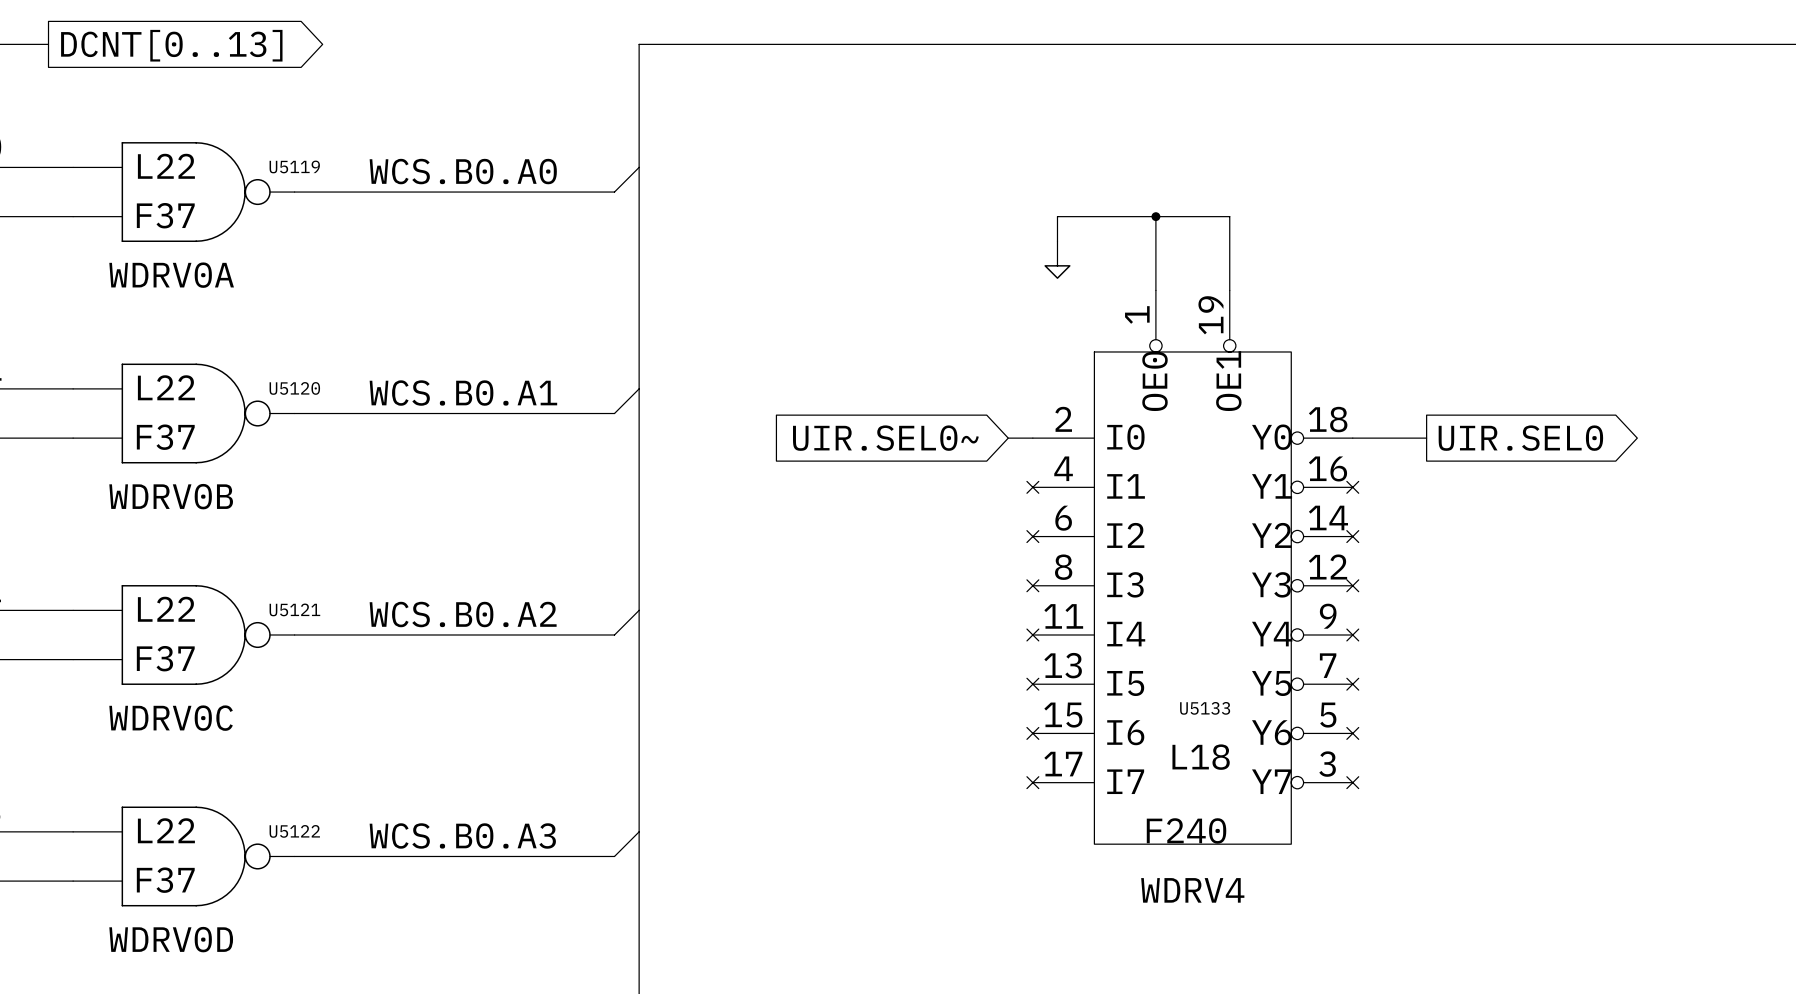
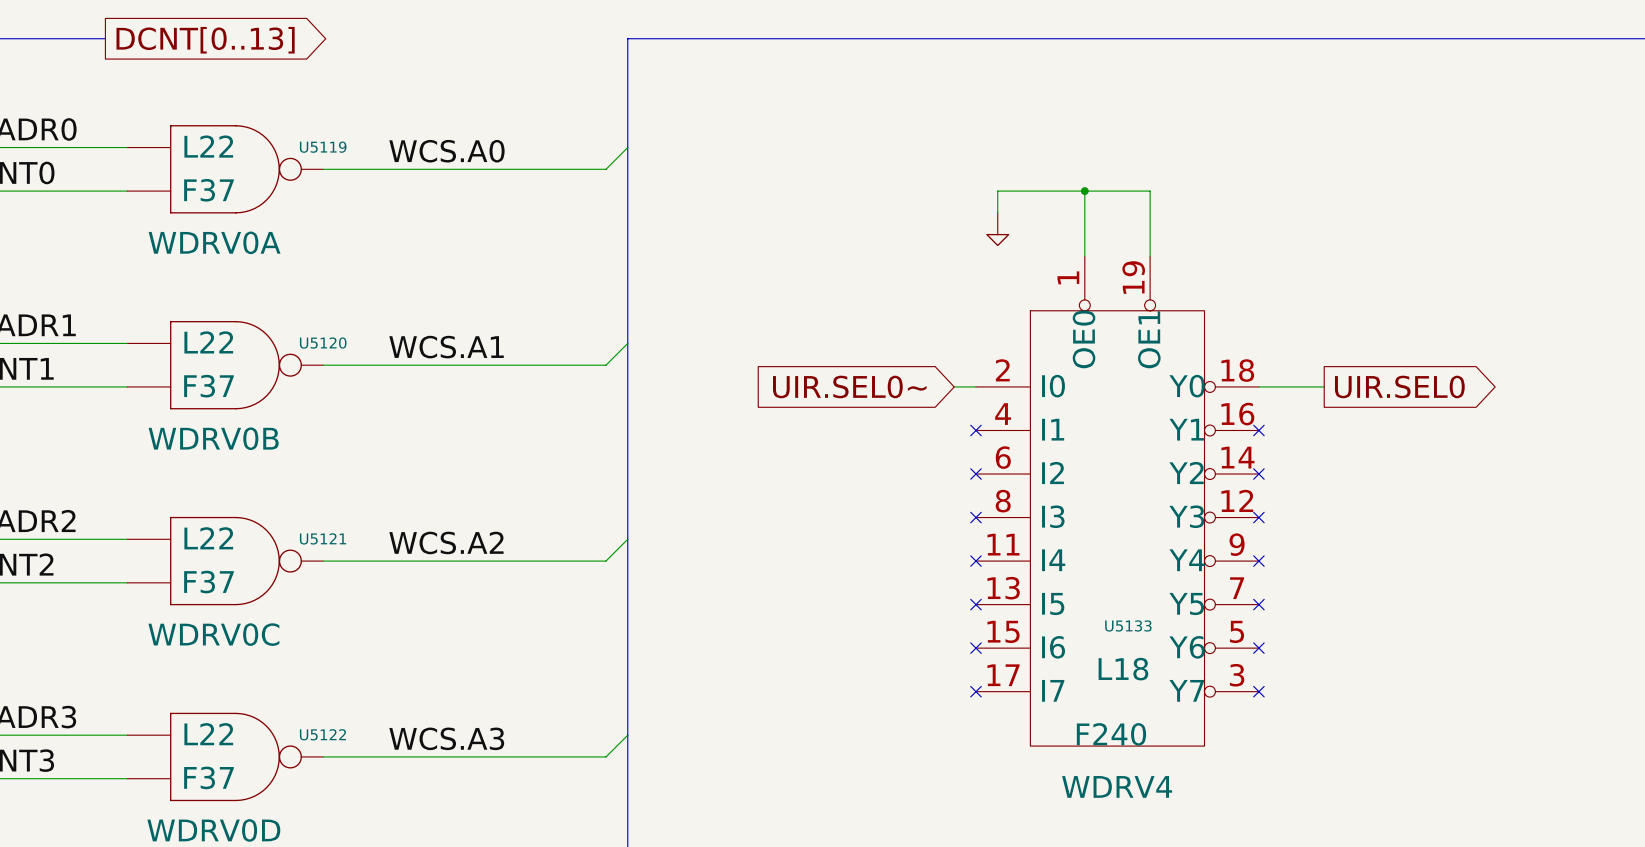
label: WCS.B0.A0 (463, 171) -> WCS.A0 (446, 151)
label: WCS.B0.A1 (463, 393) -> WCS.A1 (446, 347)
label: WCS.B0.A2 (463, 614) -> WCS.A2 (446, 542)
label: WCS.B0.A3 (462, 835) -> WCS.A3 (446, 738)

